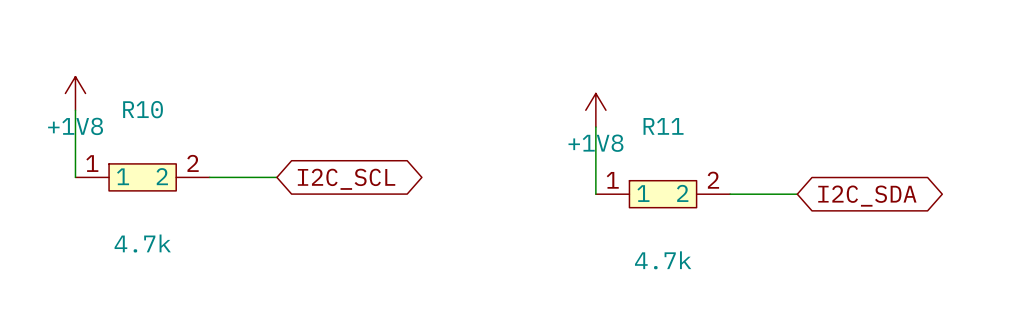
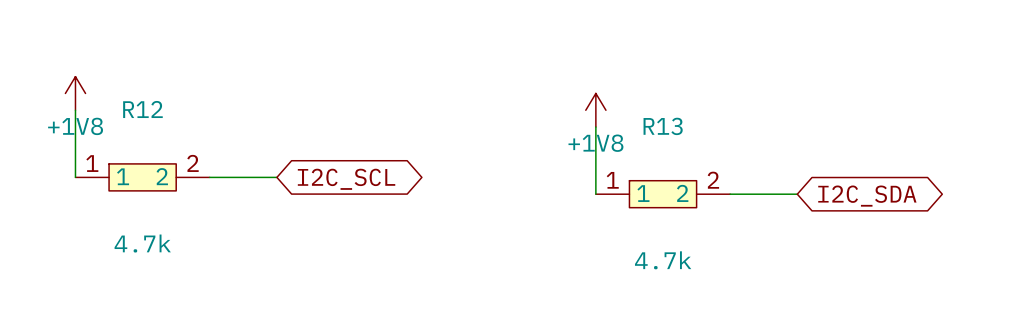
R10 name: R10 (143, 109) -> R12 (142, 109)
R11 name: R11 (663, 126) -> R13 (663, 126)

